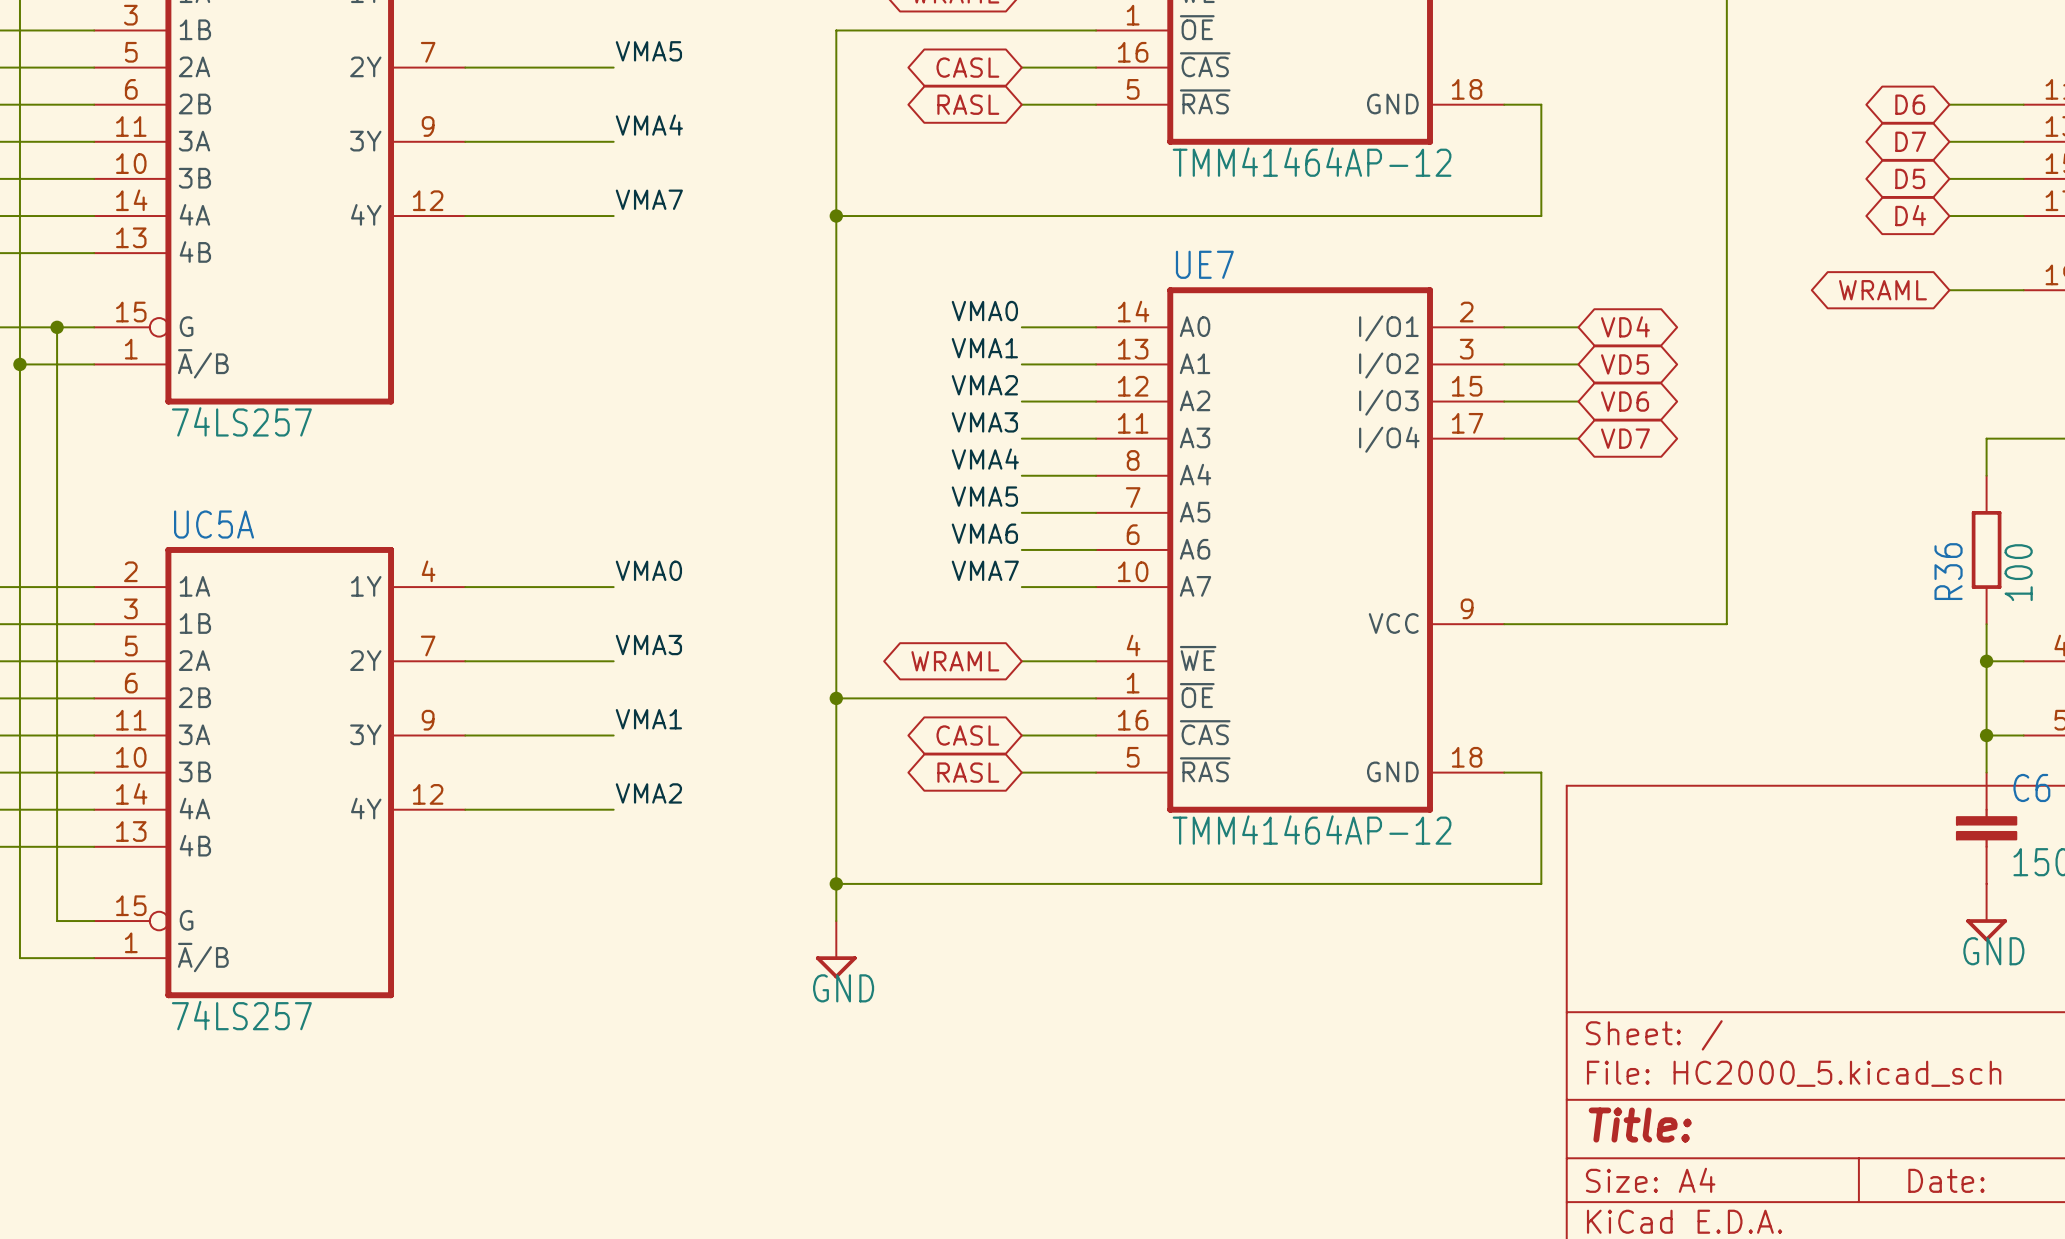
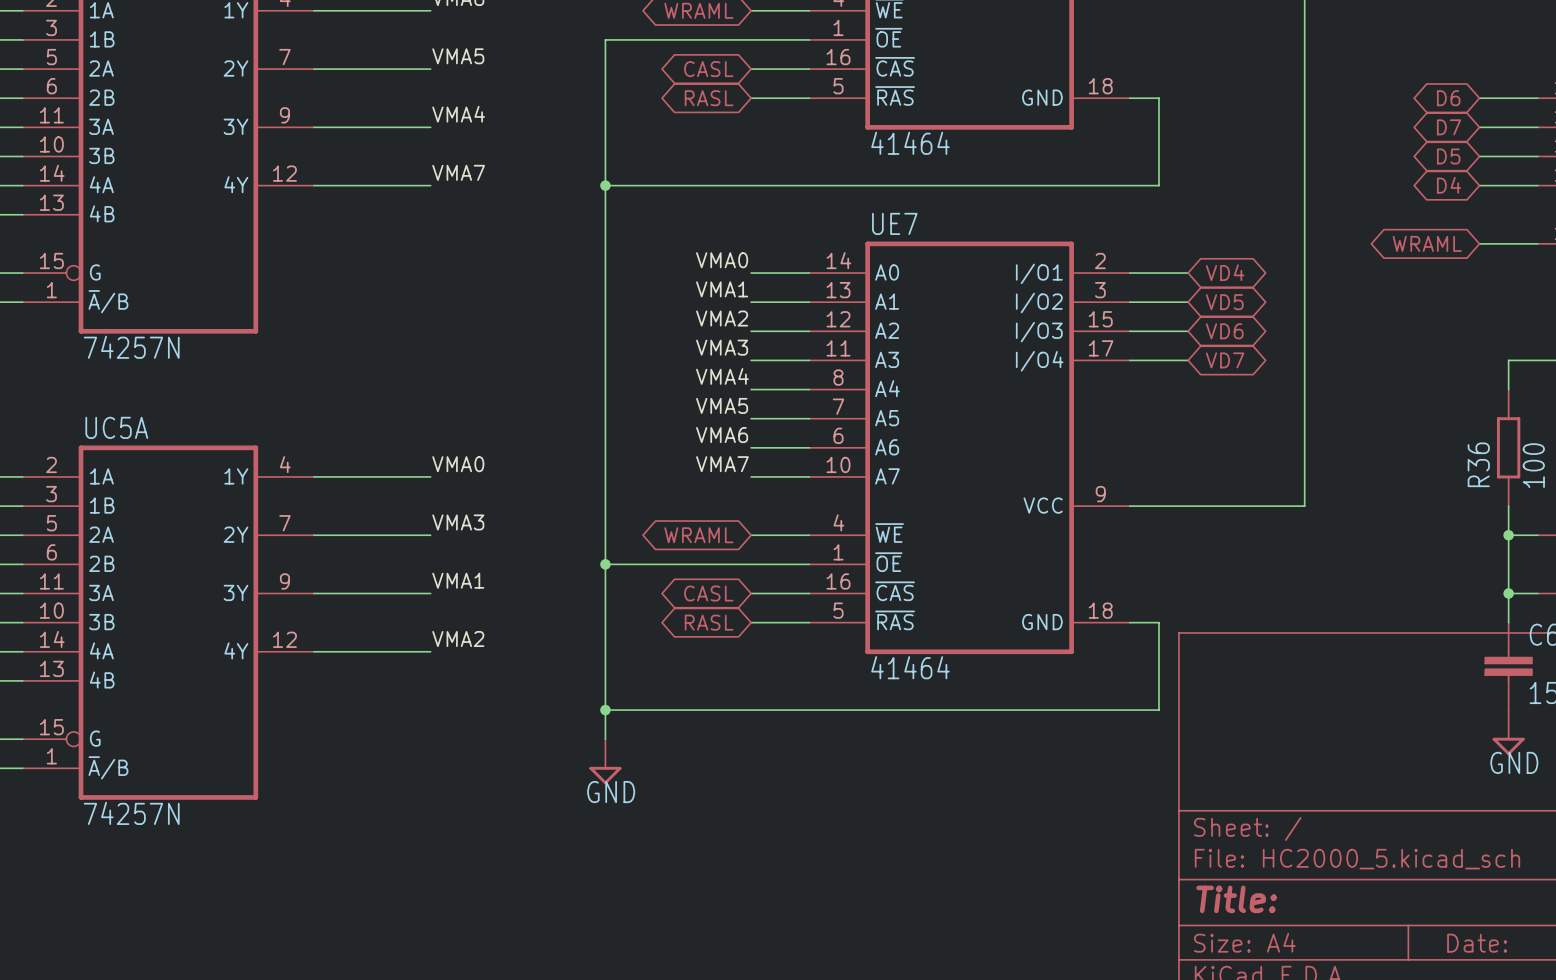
part value: TMM41464AP-12 (1312, 162) -> 41464 (910, 143)
part value: 74LS257 (241, 421) -> 74257N (131, 347)
UE7 value: TMM41464AP-12 (1312, 830) -> 41464 (910, 667)
UC5A value: 74LS257 (241, 1015) -> 74257N (131, 813)

